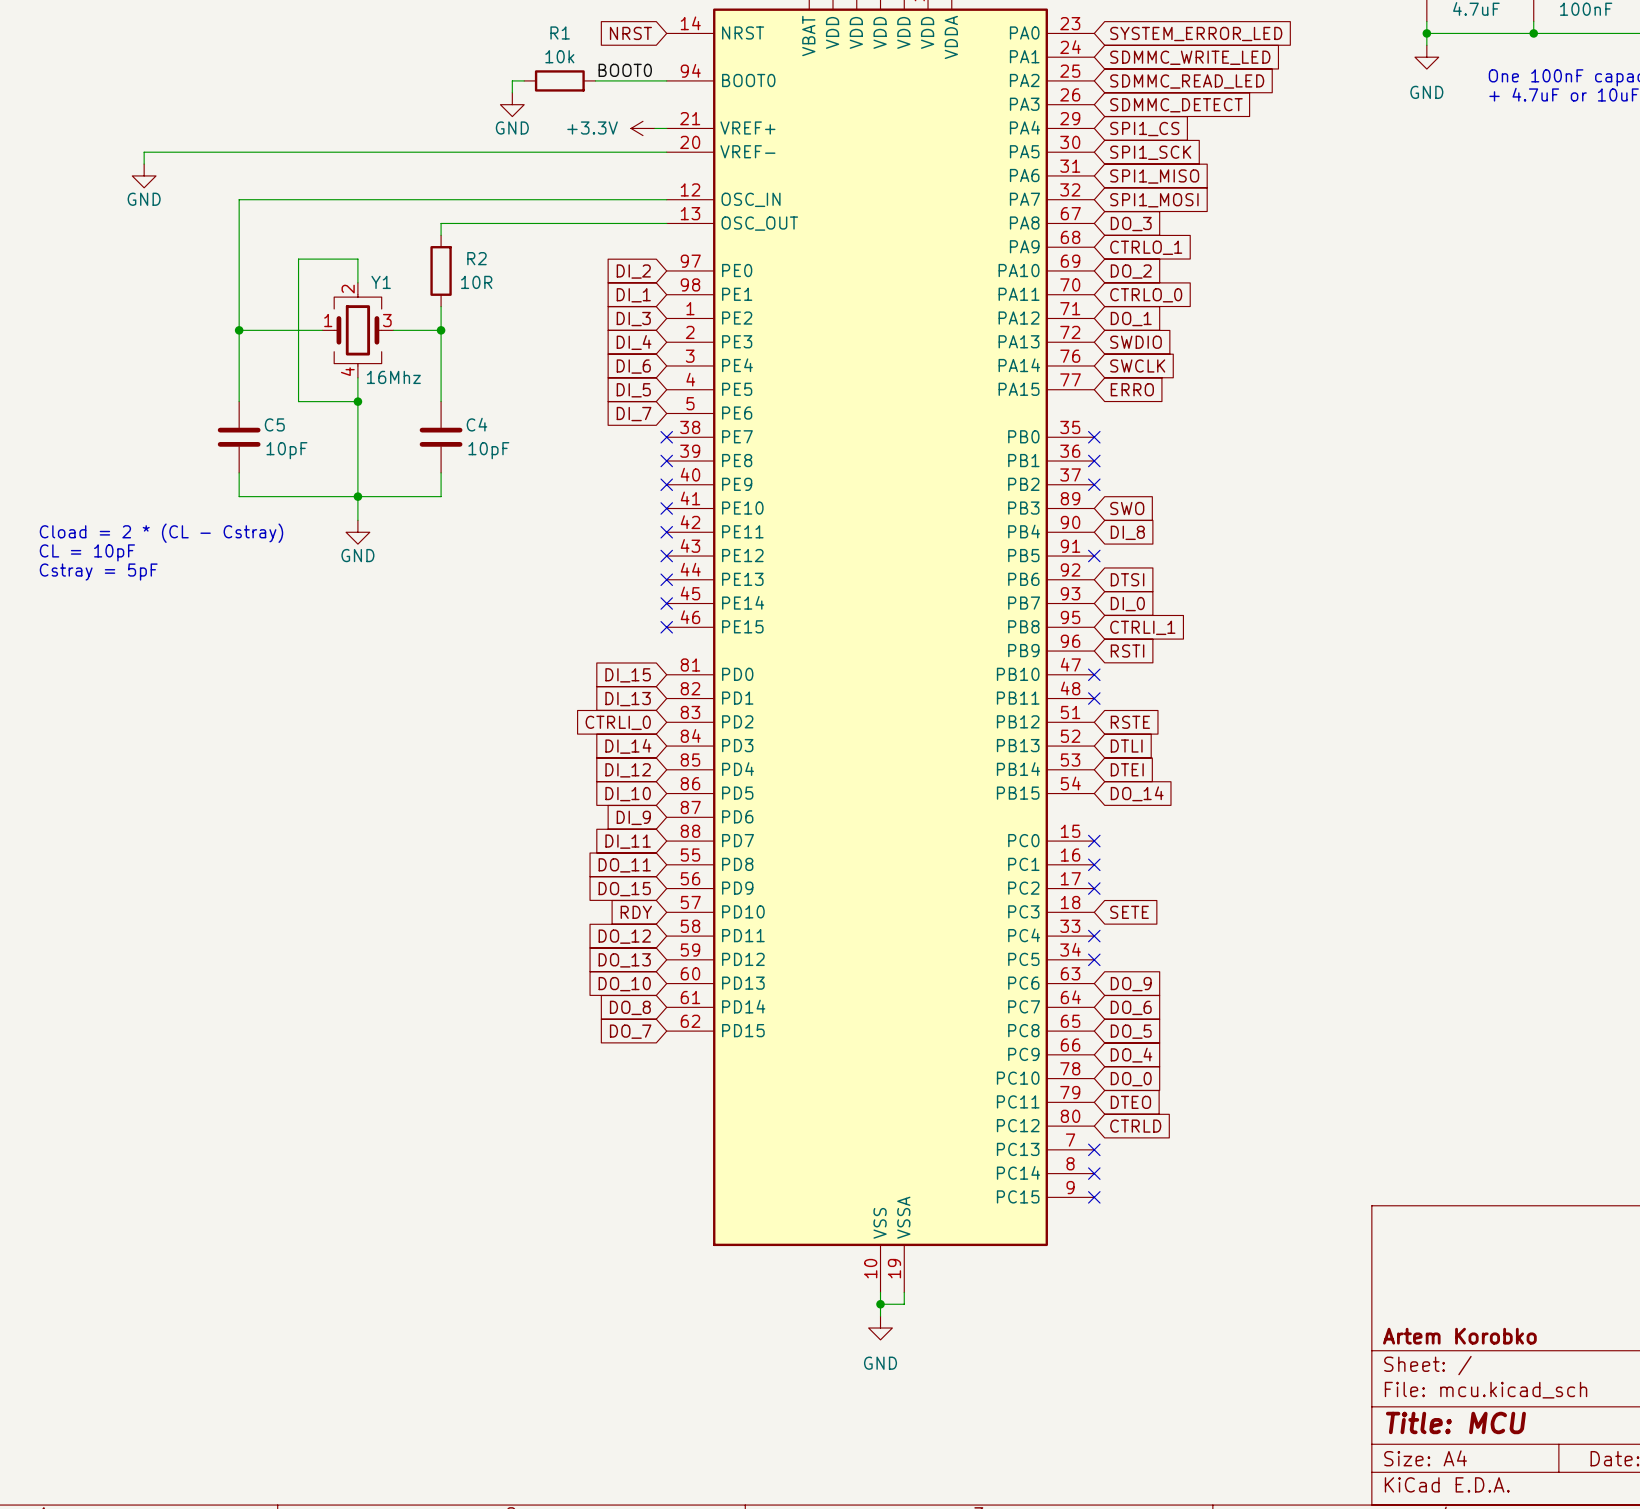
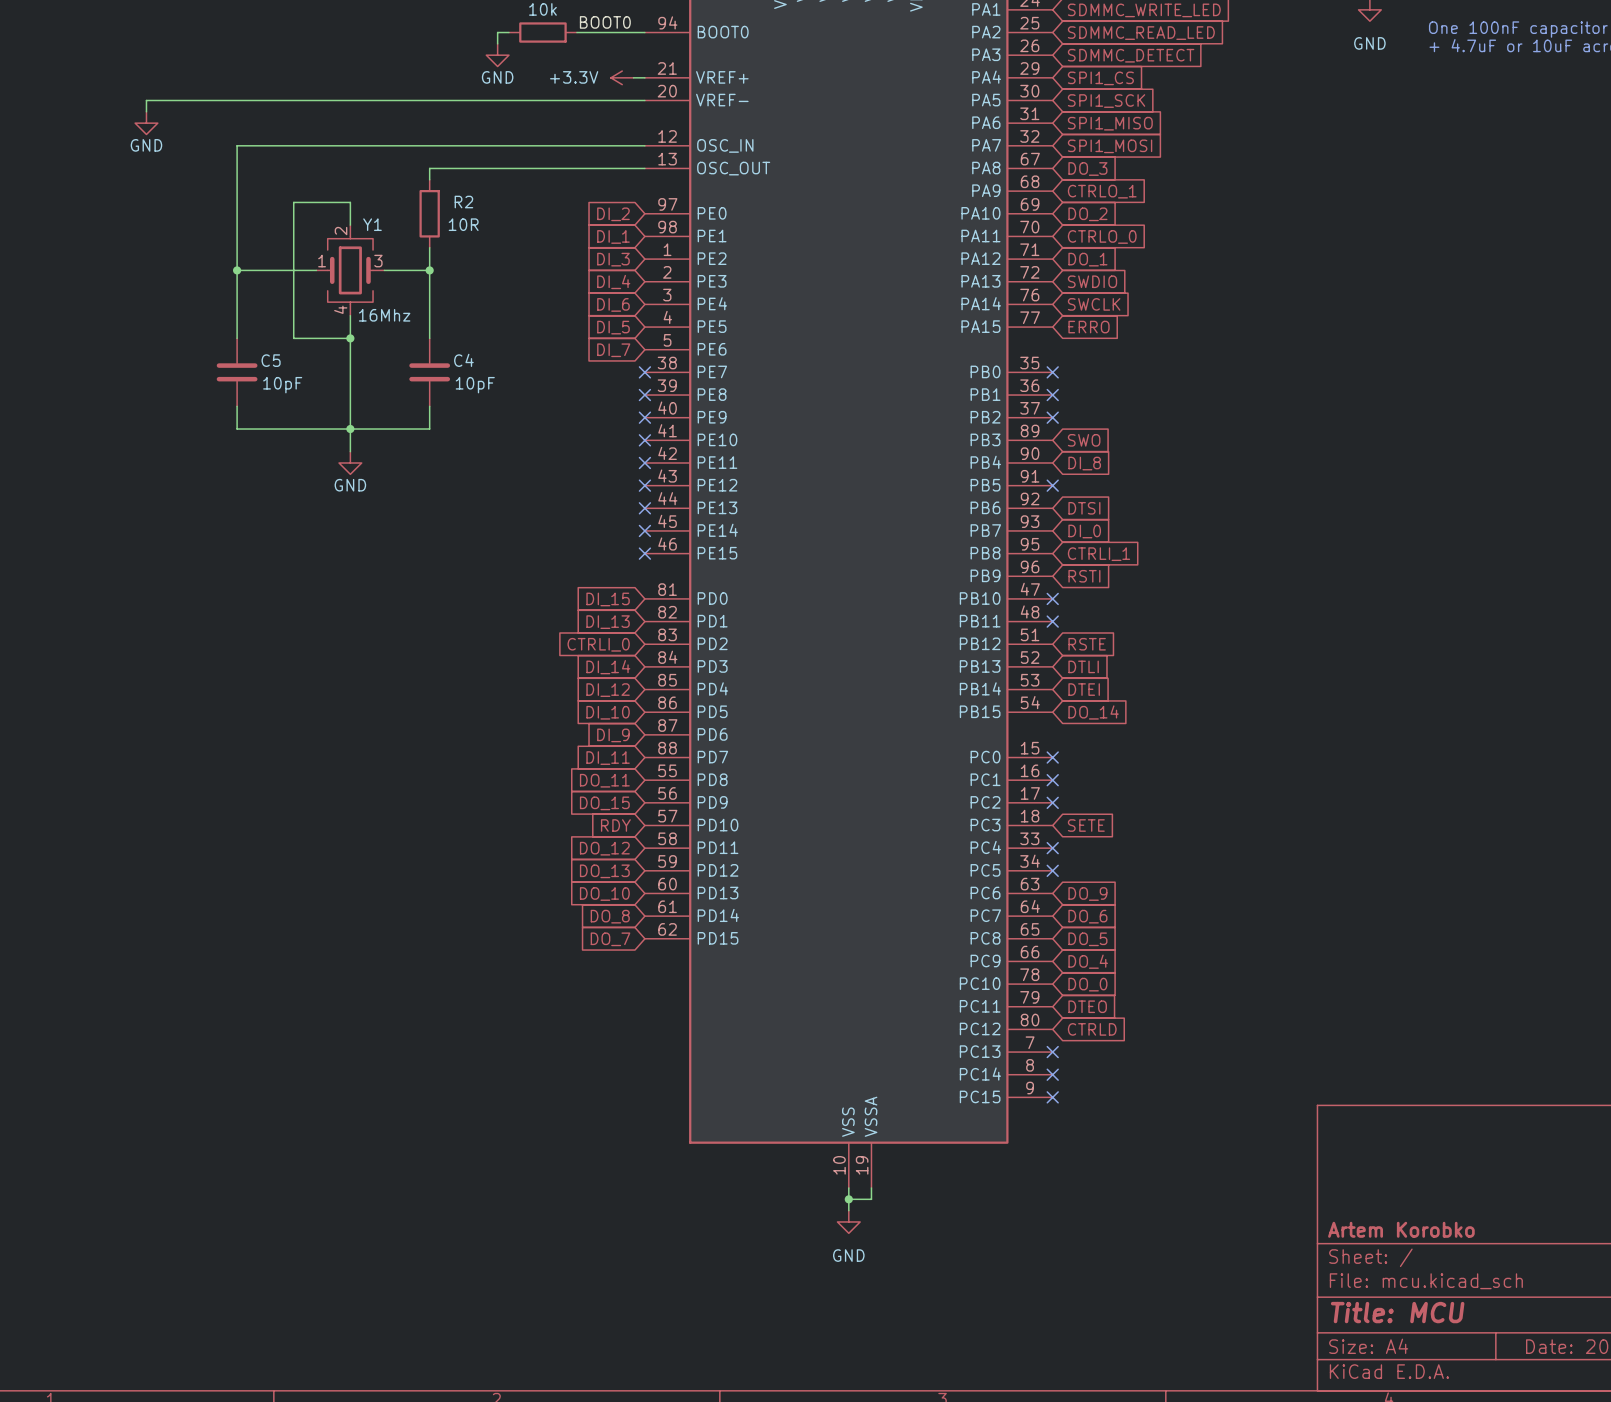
text: Cload = 2 * (CL - Cstray) (161, 533) -> none
text: CL = 10pF (87, 552) -> none
text: Cstray = 5pF (98, 572) -> none

